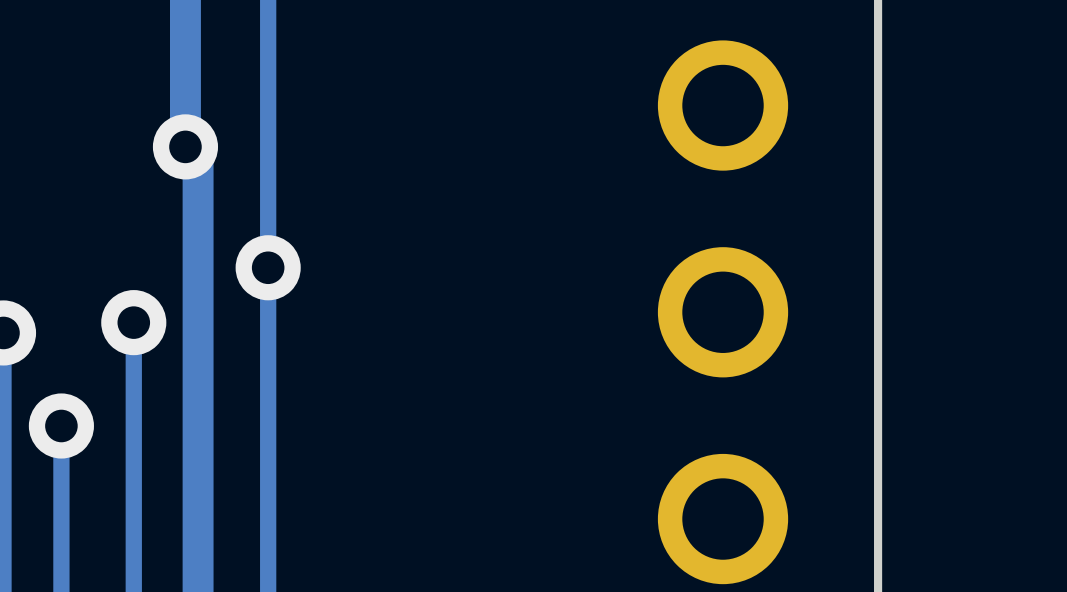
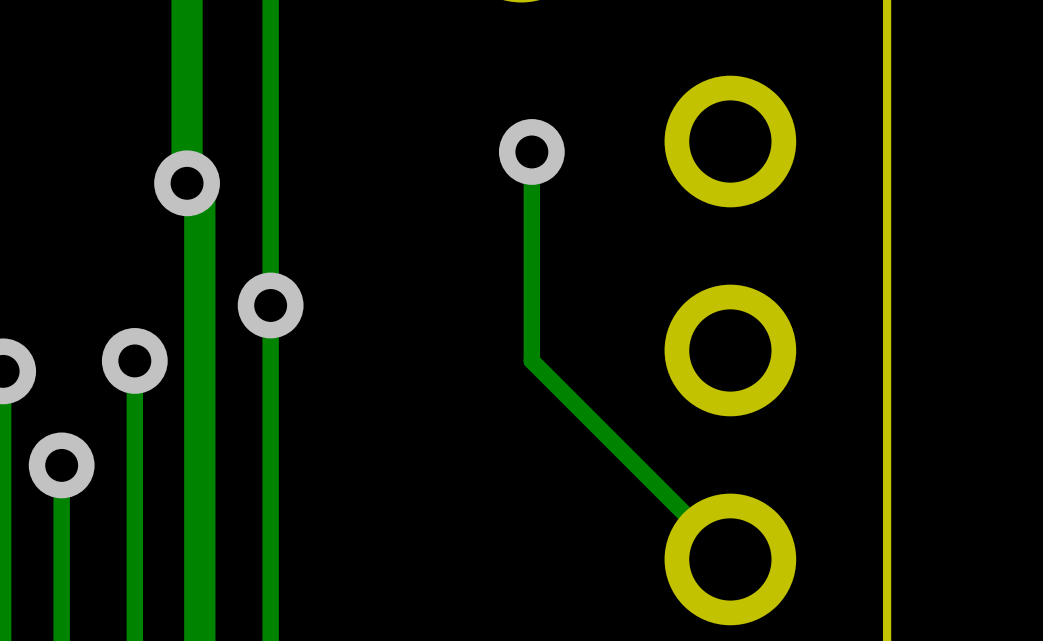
track: none -> (531, 151) (531, 360) (730, 559)
via: none -> (531, 151)

